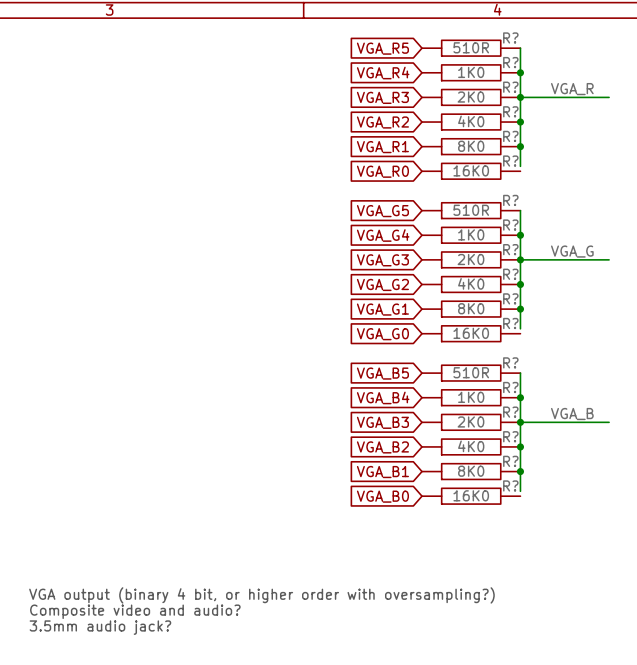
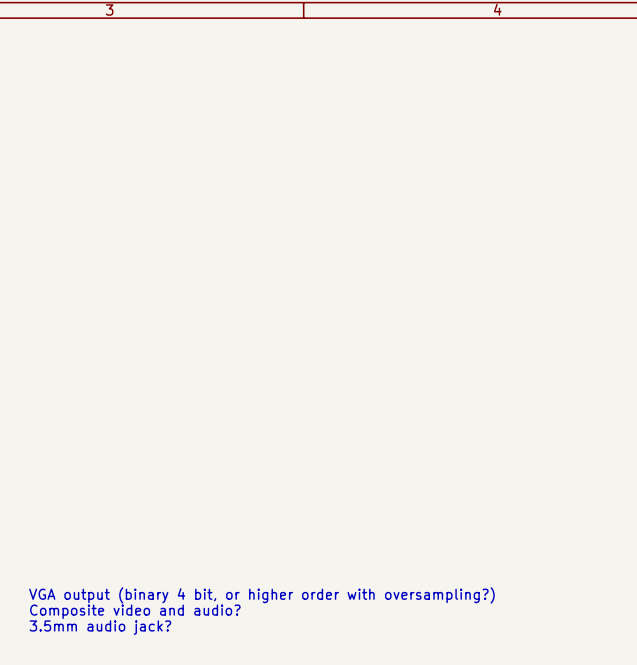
global label: VGA_R5 (382, 48) -> none
R?: 510R (471, 48) -> none
wire: (520, 48) (520, 166) -> none
R?: 1K0 (471, 72) -> none
junction: (520, 72) -> none
global label: VGA_R4 (383, 73) -> none
label: VGA_R (572, 89) -> none
global label: VGA_R3 (382, 97) -> none
R?: 2K0 (471, 97) -> none
wire: (520, 97) (609, 97) -> none
junction: (520, 97) -> none
global label: VGA_R2 (382, 122) -> none
R?: 4K0 (471, 122) -> none
junction: (520, 122) -> none
R?: 8K0 (471, 146) -> none
junction: (520, 146) -> none
global label: VGA_R1 (382, 147) -> none
global label: VGA_R0 (382, 171) -> none
R?: 16K0 (471, 171) -> none
R?: 510R (471, 210) -> none
wire: (520, 210) (520, 328) -> none
global label: VGA_G5 (382, 211) -> none
global label: VGA_G4 (383, 235) -> none
R?: 1K0 (471, 235) -> none
junction: (520, 235) -> none
label: VGA_G (572, 251) -> none
R?: 2K0 (471, 259) -> none
wire: (520, 259) (609, 259) -> none
junction: (520, 259) -> none
global label: VGA_G3 (382, 260) -> none
global label: VGA_G2 (382, 284) -> none
R?: 4K0 (471, 284) -> none
junction: (520, 284) -> none
global label: VGA_G1 (382, 309) -> none
R?: 8K0 (471, 309) -> none
junction: (520, 309) -> none
R?: 16K0 (471, 333) -> none
global label: VGA_G0 (382, 334) -> none
global label: VGA_B5 (382, 373) -> none
R?: 510R (471, 373) -> none
wire: (520, 373) (520, 491) -> none
global label: VGA_B4 (383, 397) -> none
R?: 1K0 (471, 397) -> none
junction: (520, 397) -> none
label: VGA_B (572, 414) -> none
global label: VGA_B3 (382, 422) -> none
R?: 2K0 (471, 422) -> none
wire: (520, 422) (609, 422) -> none
junction: (520, 422) -> none
R?: 4K0 (471, 446) -> none
junction: (520, 446) -> none
global label: VGA_B2 (382, 447) -> none
R?: 8K0 (471, 471) -> none
junction: (520, 471) -> none
global label: VGA_B1 (382, 472) -> none
global label: VGA_B0 (382, 496) -> none
R?: 16K0 (471, 496) -> none

